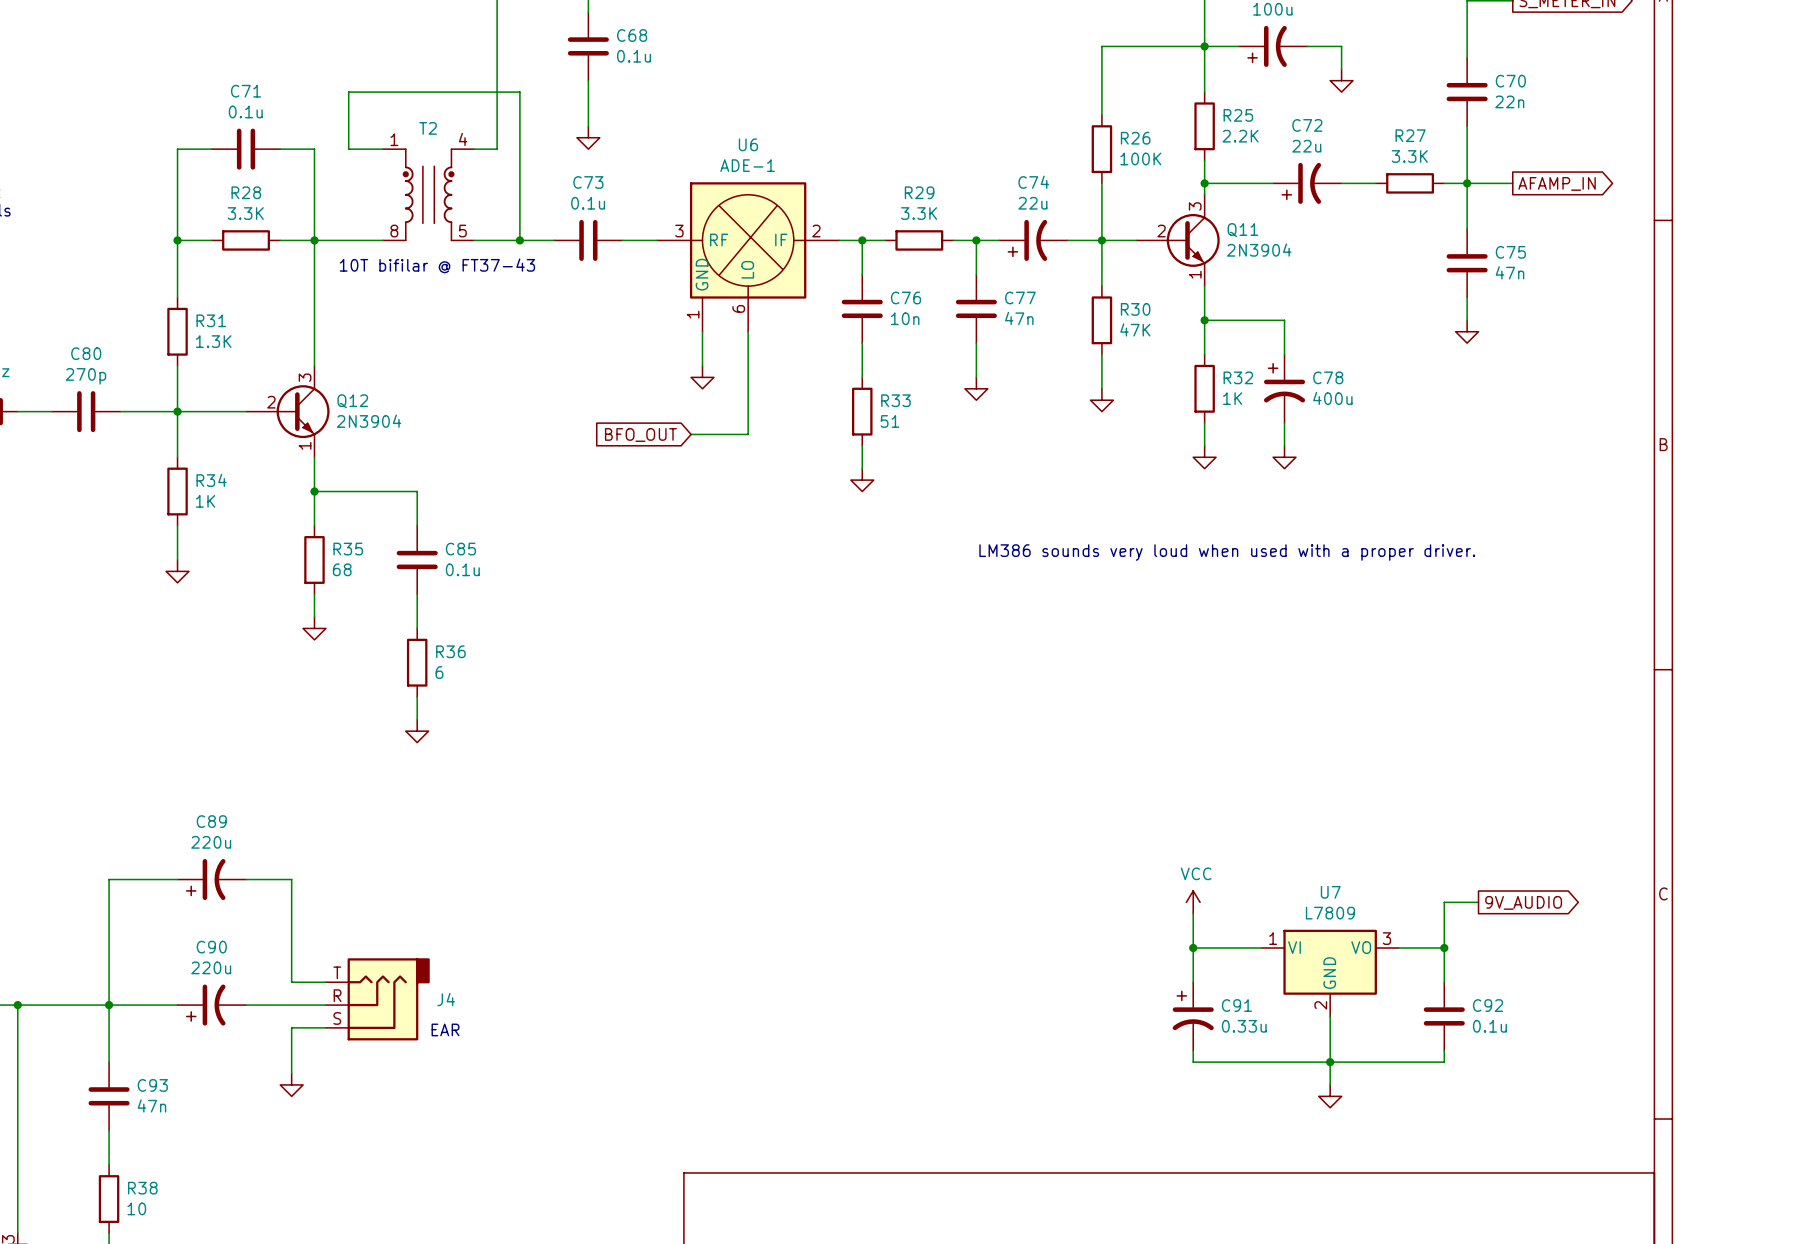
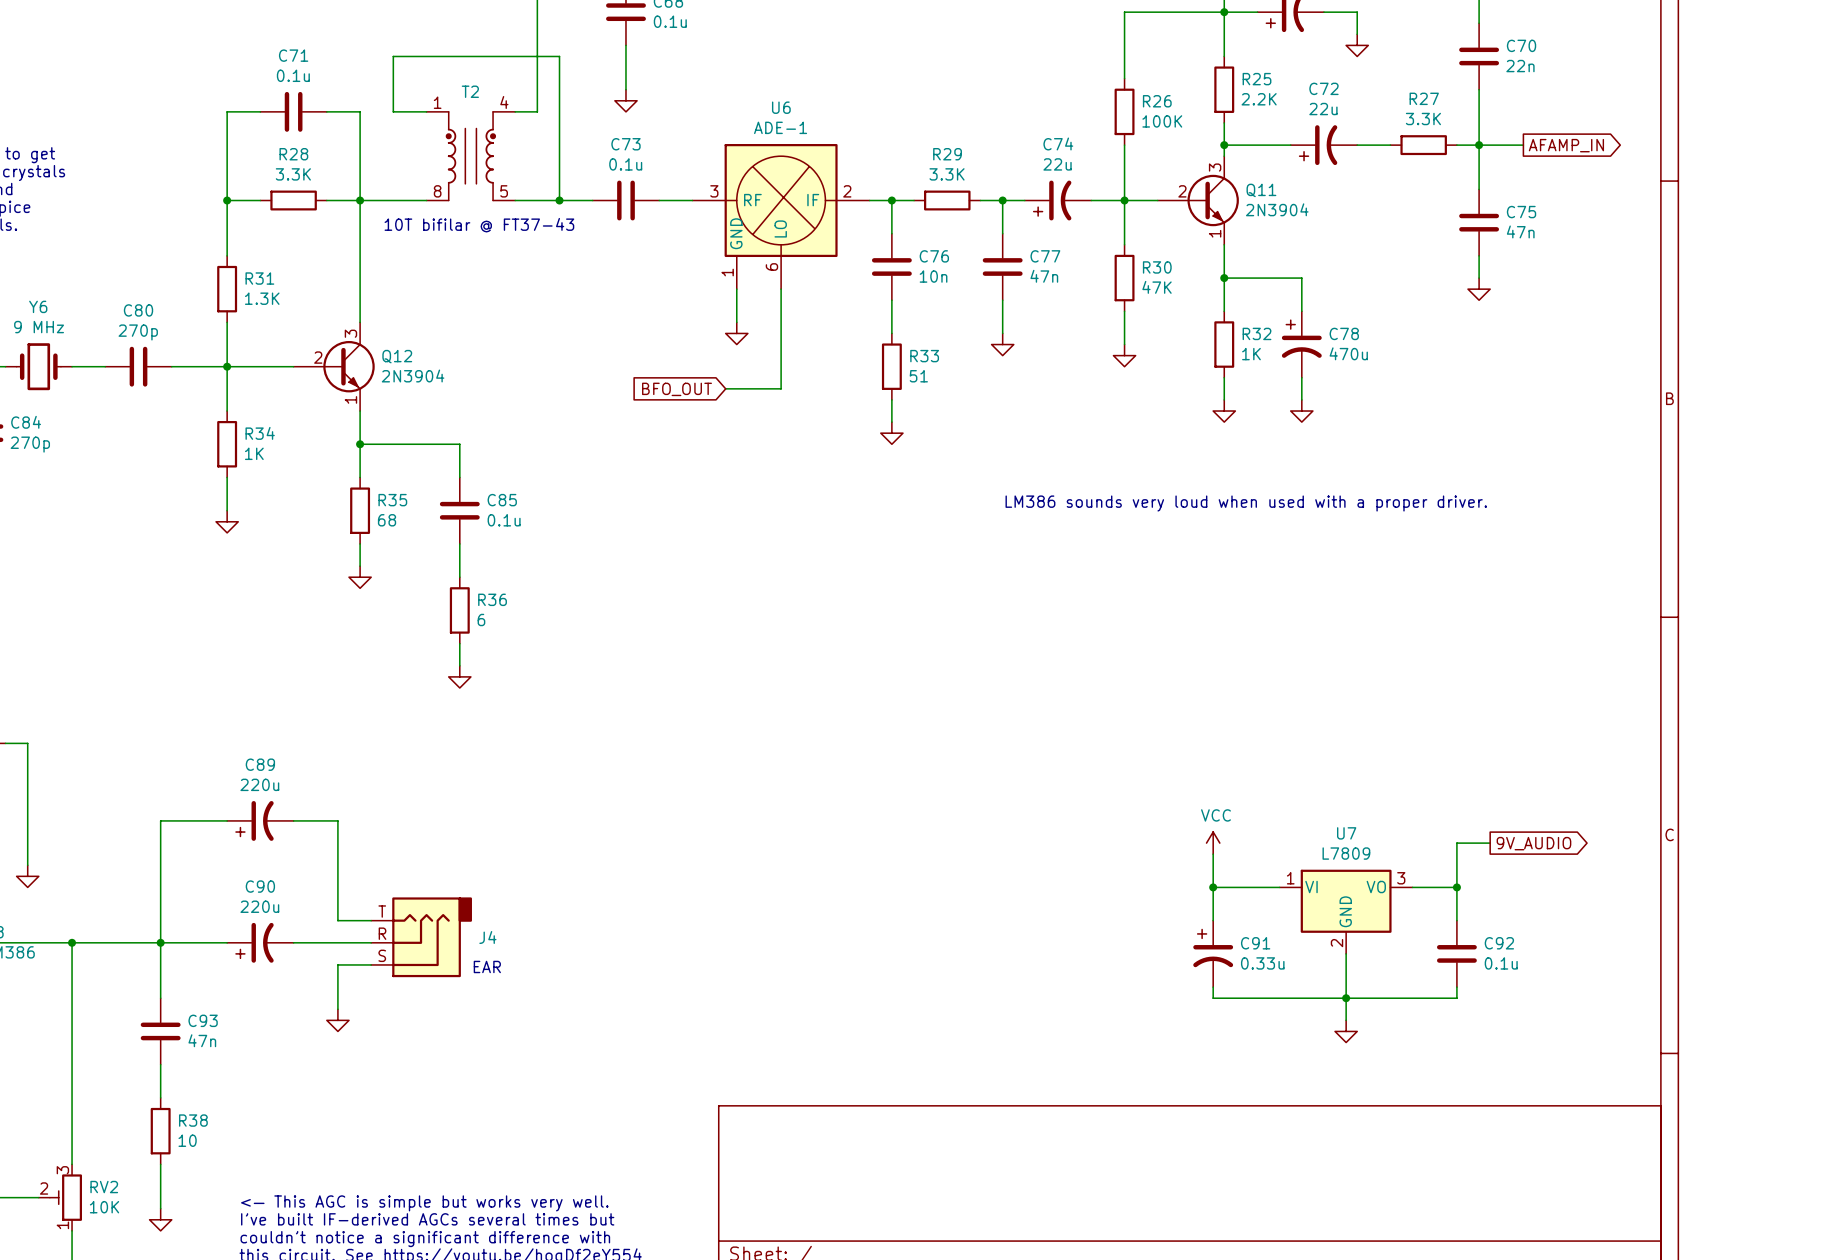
C78 value: 400u (1332, 398) -> 470u (1348, 353)

